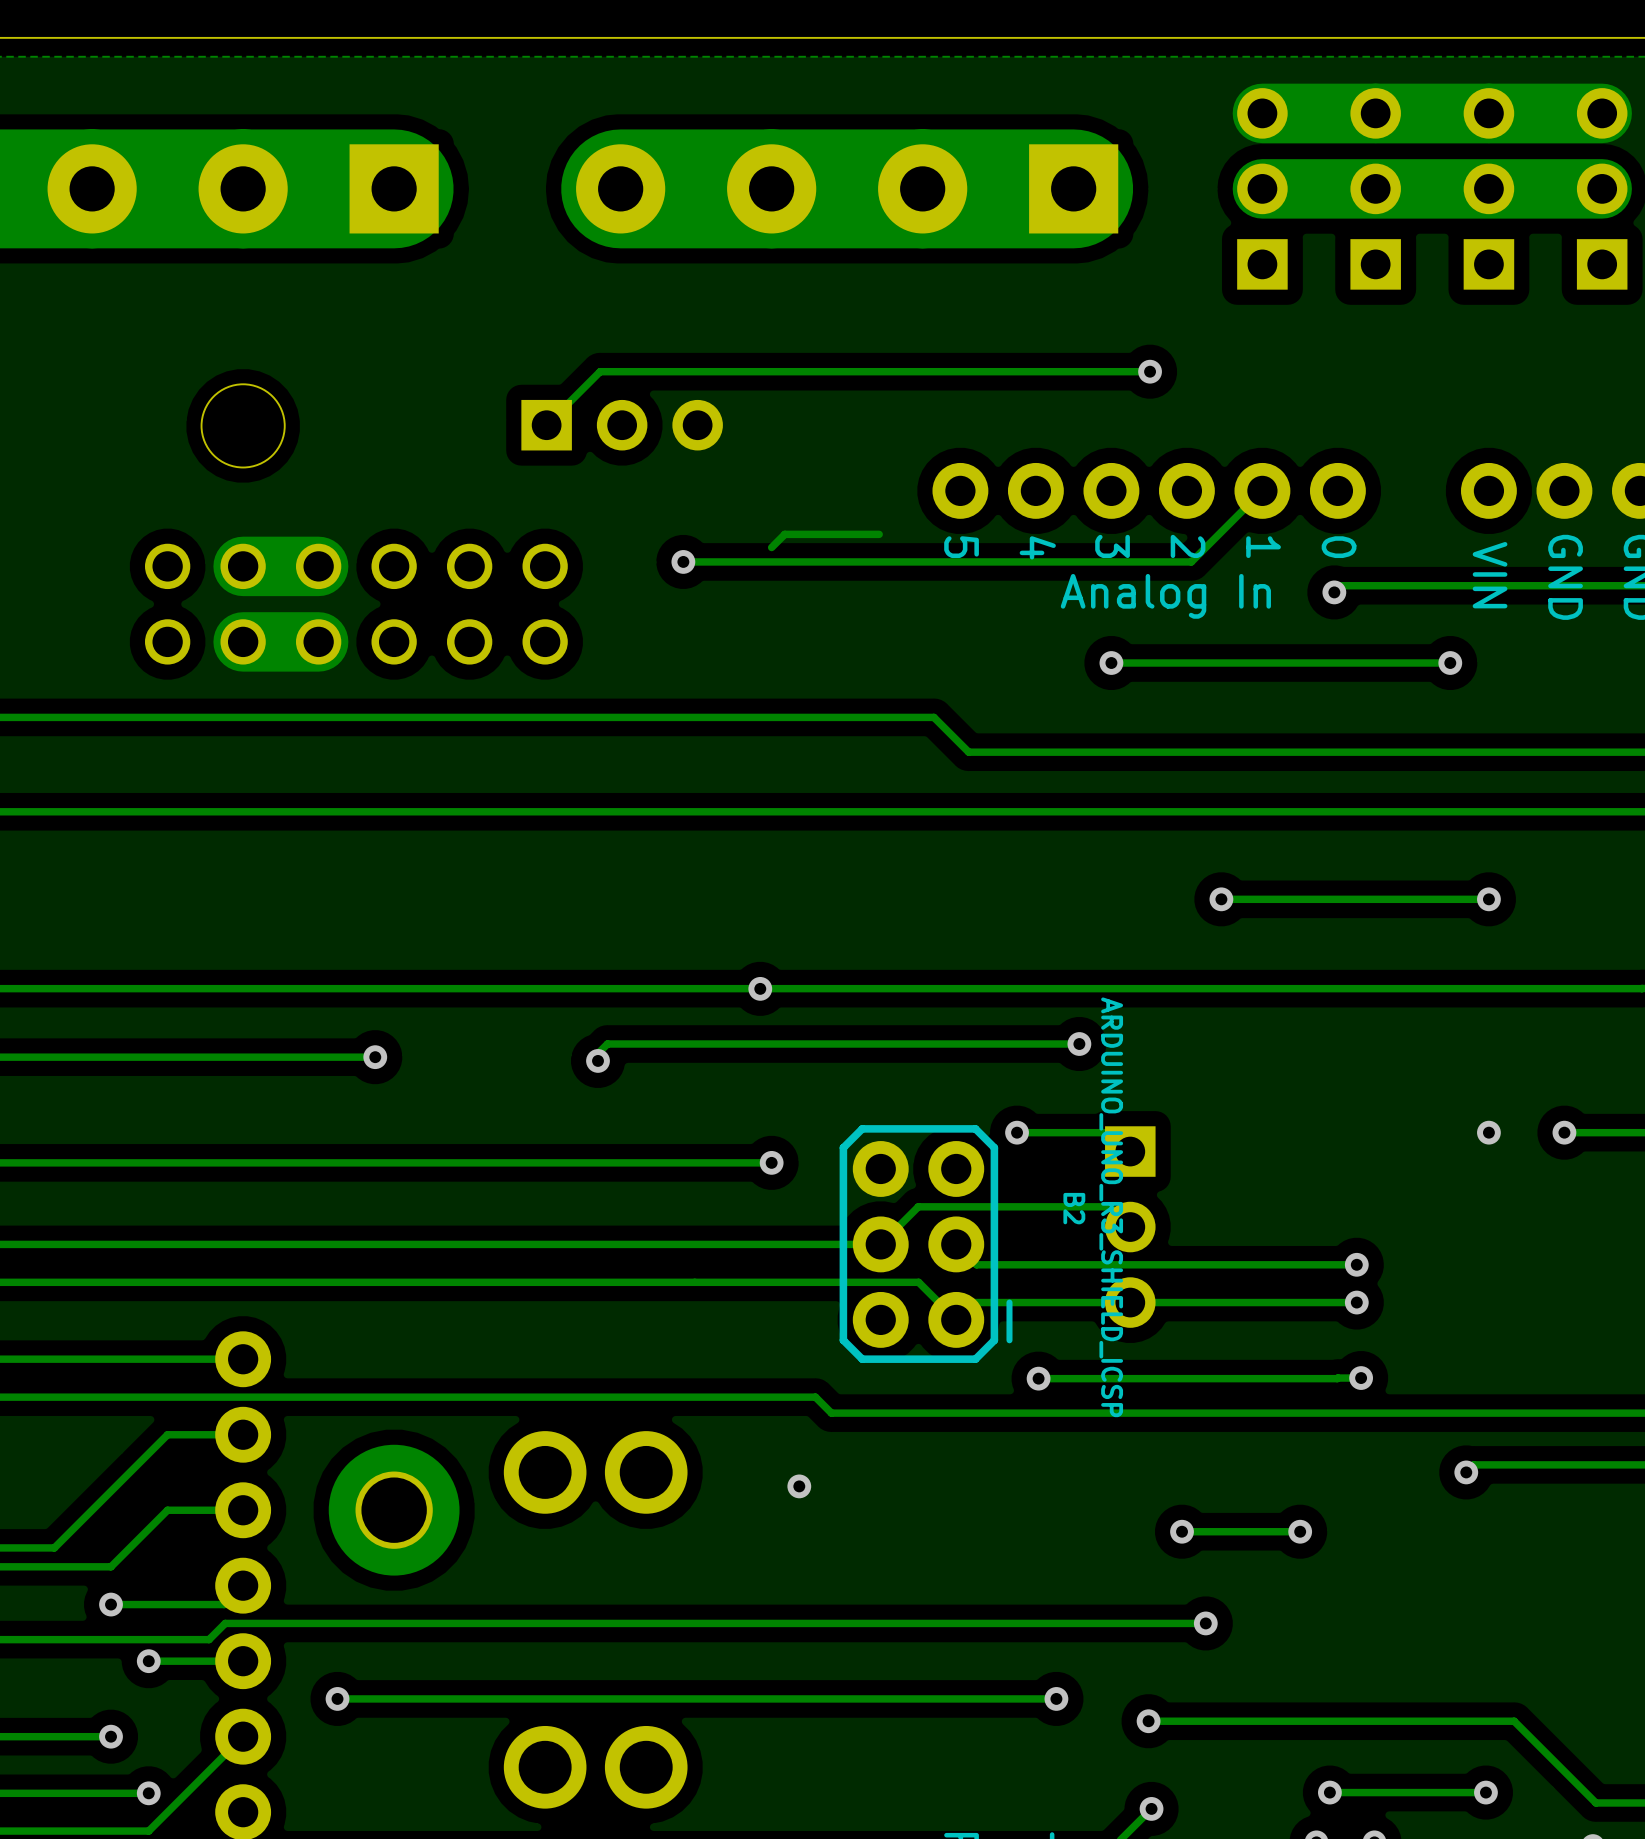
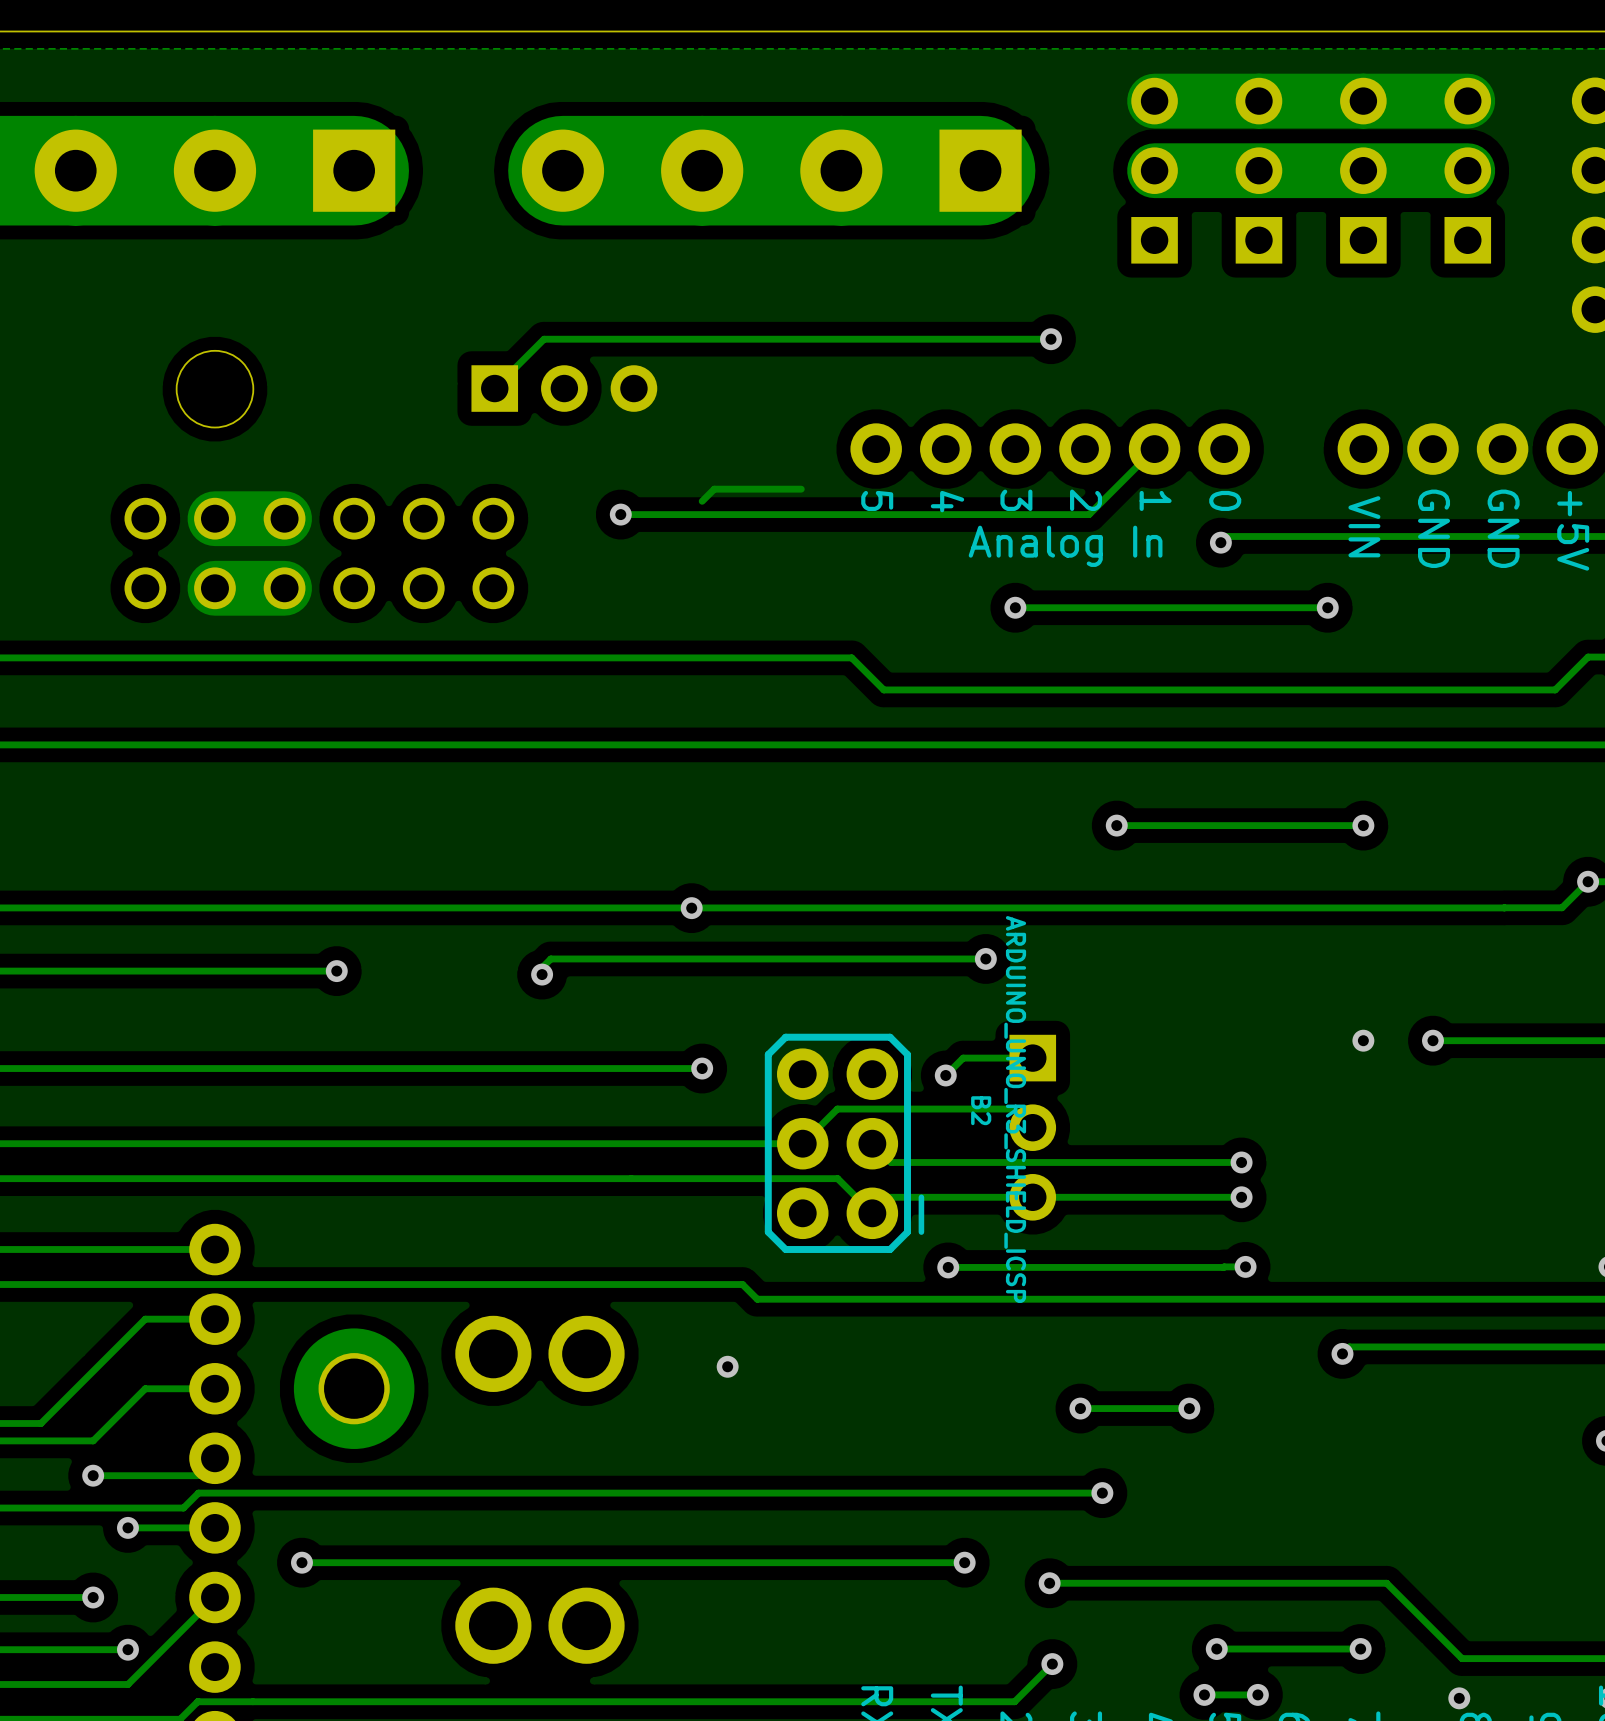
via position: (1017, 1132) -> (945, 1075)
track: (1111, 1132) (1017, 1132) -> none
track: none -> (1032, 1058) (963, 1058) (945, 1075)

